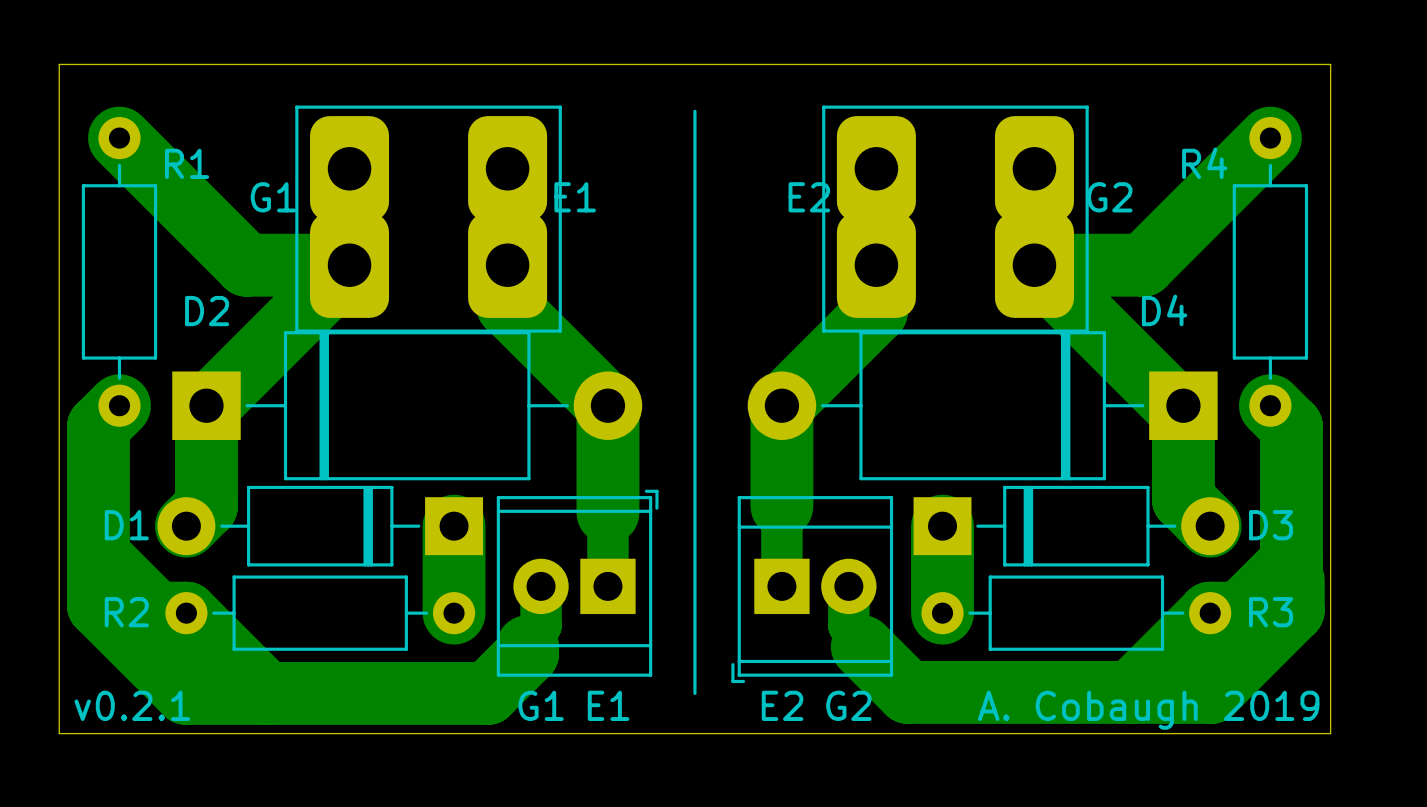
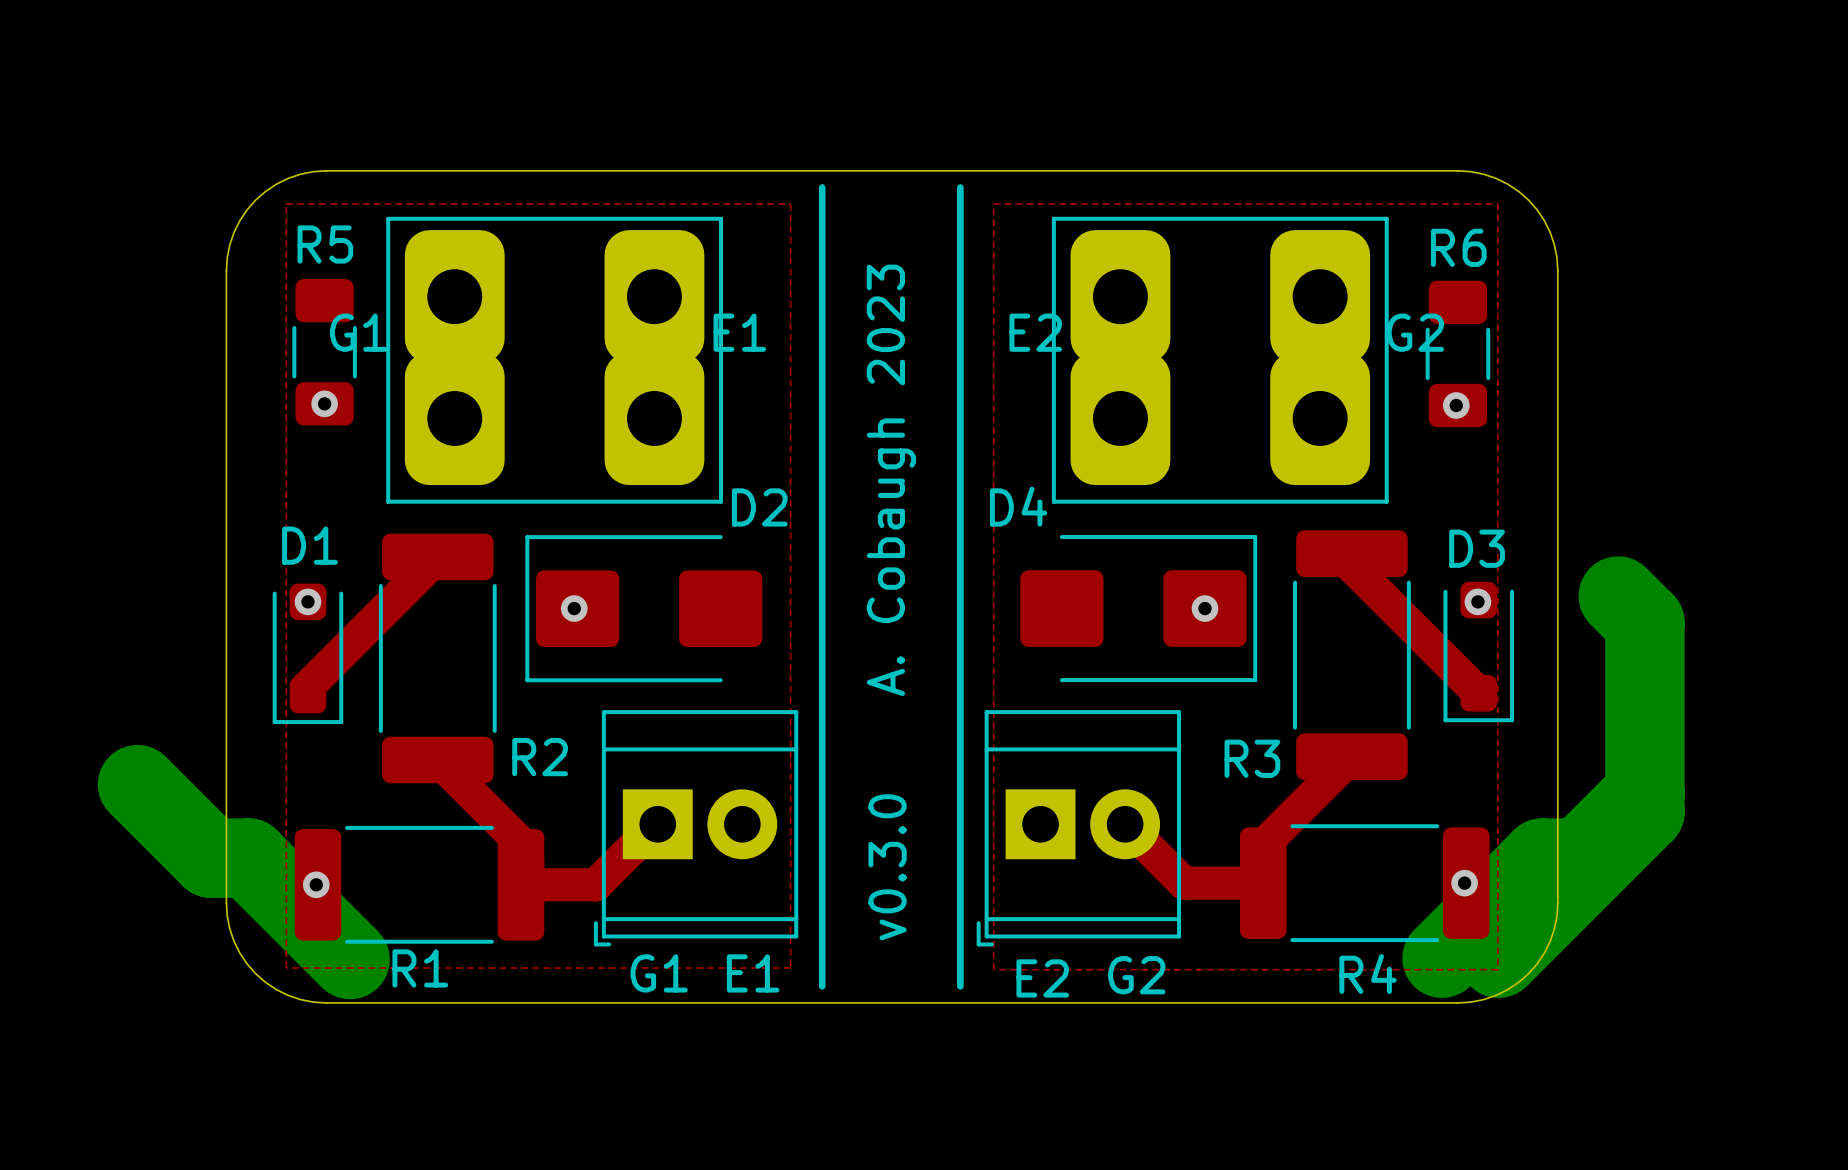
board edge: (59, 64) (59, 733) (1330, 733) (1330, 64) (59, 64) -> (326, 170) (313, 171) (288, 178) (265, 191) (255, 200) (247, 209) (234, 232) (229, 244) (226, 270) (227, 916) (234, 941) (247, 963) (265, 982) (276, 989) (300, 999) (326, 1002) (1457, 1002) (1483, 999) (1507, 989) (1528, 973) (1544, 953) (1554, 928) (1557, 903) (1557, 270) (1554, 244) (1544, 220) (1528, 200) (1507, 184) (1483, 174) (1457, 170) (326, 170)
line: none -> (822, 187) (822, 986)
line: none -> (960, 187) (960, 986)
top zone outline: none -> (286, 204) (790, 204) (790, 968) (286, 968) (286, 204)
top zone outline: none -> (993, 204) (993, 969) (1497, 969) (1497, 204) (993, 204)
line: (694, 111) (694, 693) -> none
R1 footprint: [81, 117, 158, 427] -> [294, 825, 545, 944]
R4 footprint: [1232, 117, 1309, 427] -> [1239, 824, 1490, 943]
bottom track: (119, 138) (246, 265) (349, 265) (209, 405) (206, 405) (206, 506) (186, 526) -> none
bottom track: (1270, 138) (1143, 265) (1034, 265) (1174, 405) (1183, 405) (1183, 499) (1210, 526) -> none
R1 name position: R1 (187, 163) -> R1 (420, 968)
R4 name position: R4 (1204, 163) -> R4 (1368, 973)
R5: none -> (324, 352)
R6: none -> (1457, 353)
via: none -> (324, 403)
via: none -> (1456, 405)
bottom track: (507, 265) (507, 305) (607, 405) (607, 586) -> none
bottom track: (876, 265) (876, 311) (781, 405) (781, 586) -> none
D4 name position: D4 (1164, 310) -> D4 (1018, 506)
D2 name position: D2 (207, 311) -> D2 (759, 507)
text: none -> A. Cobaugh 2023 (891, 480)
D2 footprint: [172, 331, 643, 481] -> [525, 535, 763, 683]
D4 footprint: [747, 331, 1218, 481] -> [1020, 534, 1258, 683]
top track: none -> (1351, 553) (1351, 566) (1478, 693)
top track: none -> (437, 556) (307, 686) (307, 695)
bottom track: (119, 405) (98, 426) (98, 605) (186, 693) (487, 693) (527, 653) (527, 646) (541, 625) (541, 586) -> none
via: none -> (307, 601)
via: none -> (1477, 601)
via: none -> (574, 608)
via: none -> (1204, 608)
D1 footprint: [157, 485, 484, 567] -> [272, 583, 344, 725]
D3 footprint: [913, 485, 1240, 567] -> [1443, 581, 1515, 723]
D1 name position: D1 (126, 525) -> D1 (309, 545)
D3 name position: D3 (1271, 525) -> D3 (1477, 548)
bottom track: (454, 526) (454, 613) -> none
bottom track: (942, 526) (942, 613) -> none
top track: none -> (1351, 756) (1263, 845) (1263, 883) (1183, 883) (1125, 824)
top track: none -> (437, 759) (520, 843) (520, 884) (595, 884) (656, 824) (657, 831)
R2 footprint: [165, 575, 476, 651] -> [378, 533, 497, 784]
R3 footprint: [921, 575, 1232, 651] -> [1293, 530, 1411, 780]
bottom track: (1293, 579) (1293, 610) (1211, 692) (908, 692) (862, 646) (848, 625) (848, 586) -> none
part rotation: 0° (577, 583) -> 180° (696, 828)
part position: (812, 589) -> (1078, 828)
R2 name position: R2 (126, 612) -> R2 (540, 757)
R3 name position: R3 (1271, 612) -> R3 (1252, 758)
text: none -> v0.3.0 (887, 867)
via: none -> (1464, 883)
via: none -> (316, 884)
text: v0.2.1 (132, 705) -> none
text position: G1 (541, 705) -> G1 (659, 973)
text position: E1 (608, 705) -> E1 (753, 973)
text position: E2 (782, 705) -> E2 (1042, 978)
text position: G2 (848, 705) -> G2 (1136, 975)
text: A. Cobaugh 2019 (1148, 710) -> none

